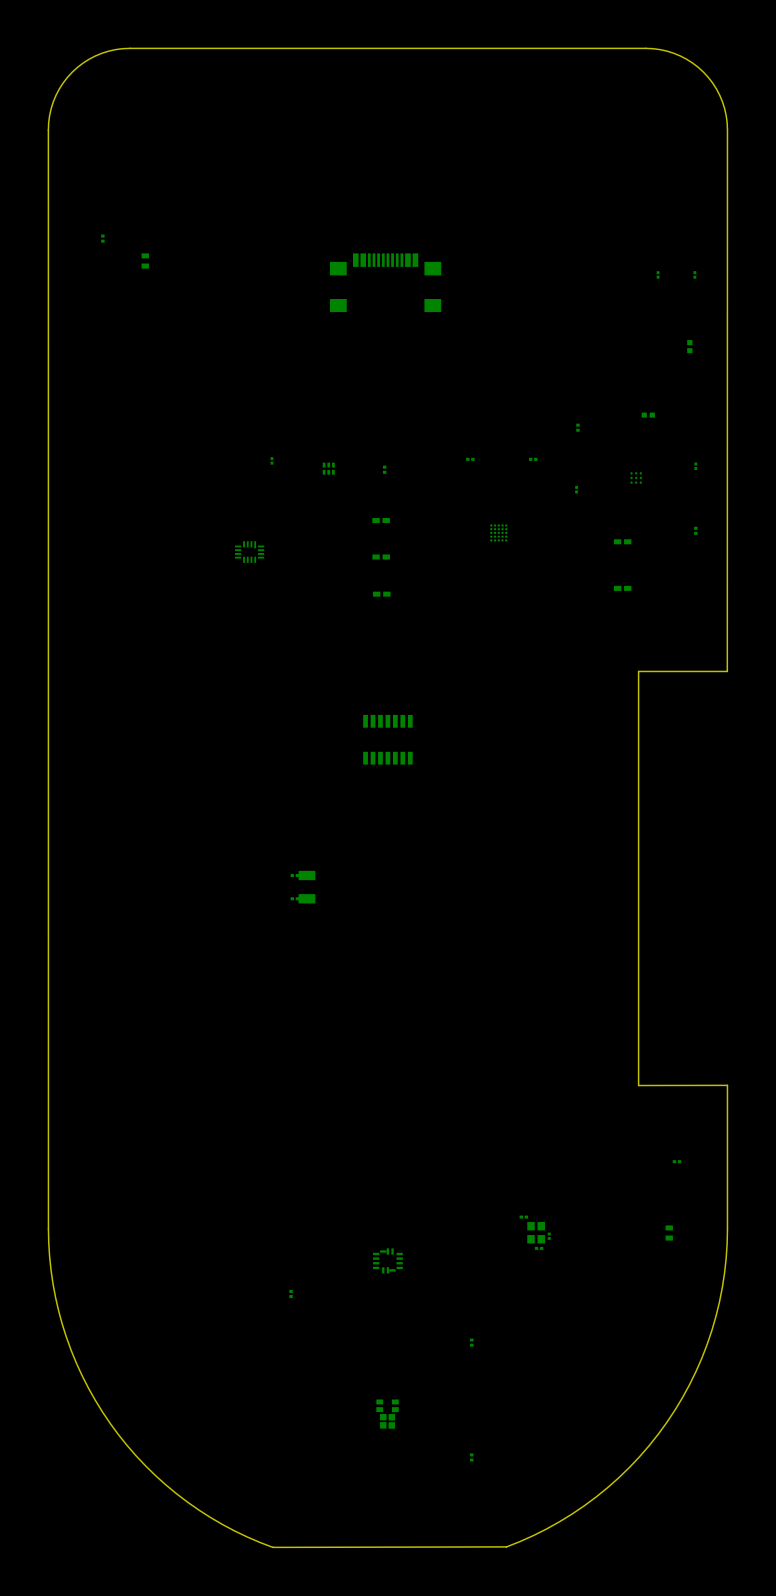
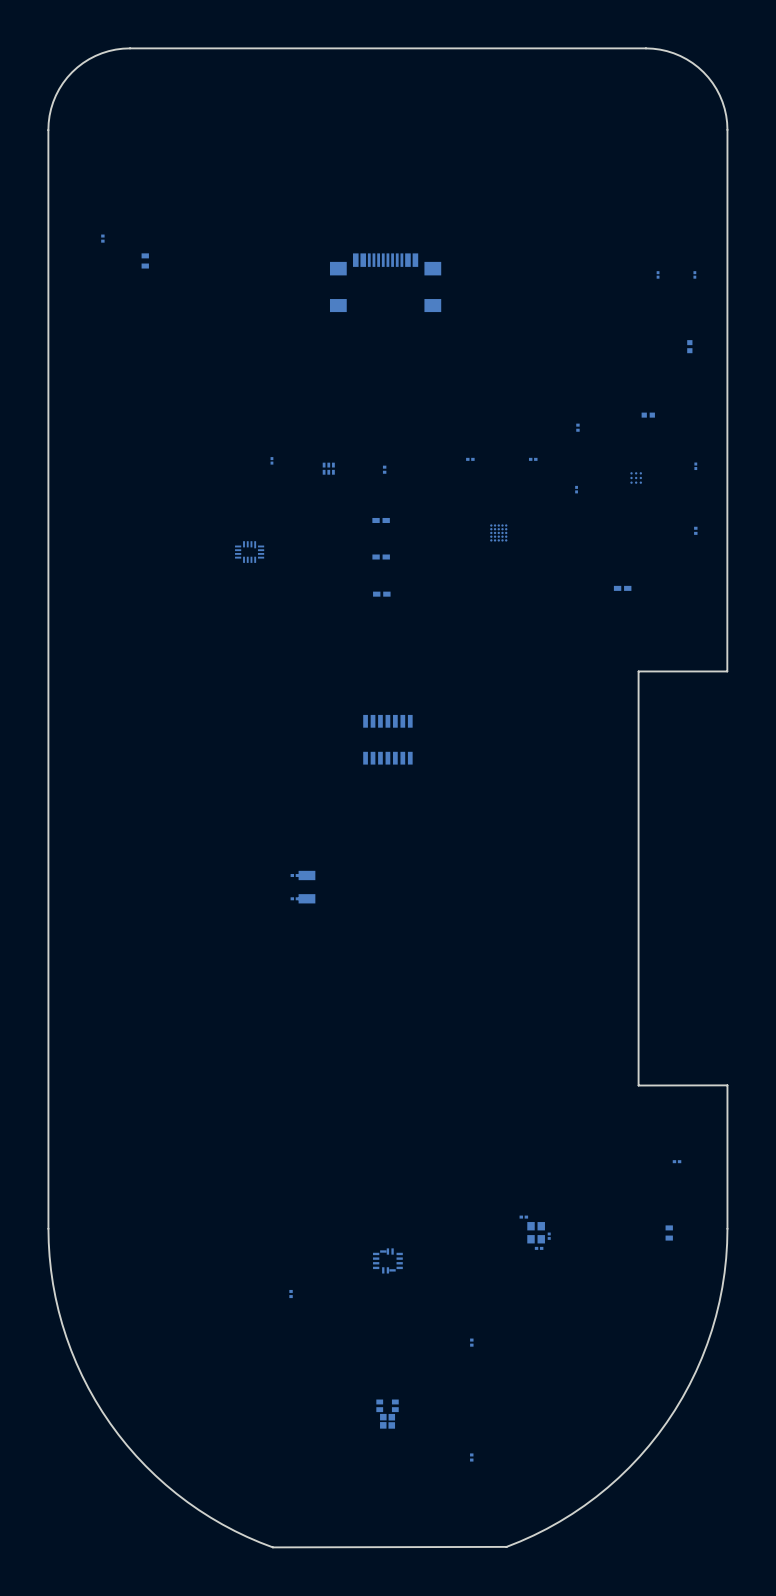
part: (622, 541) -> none

